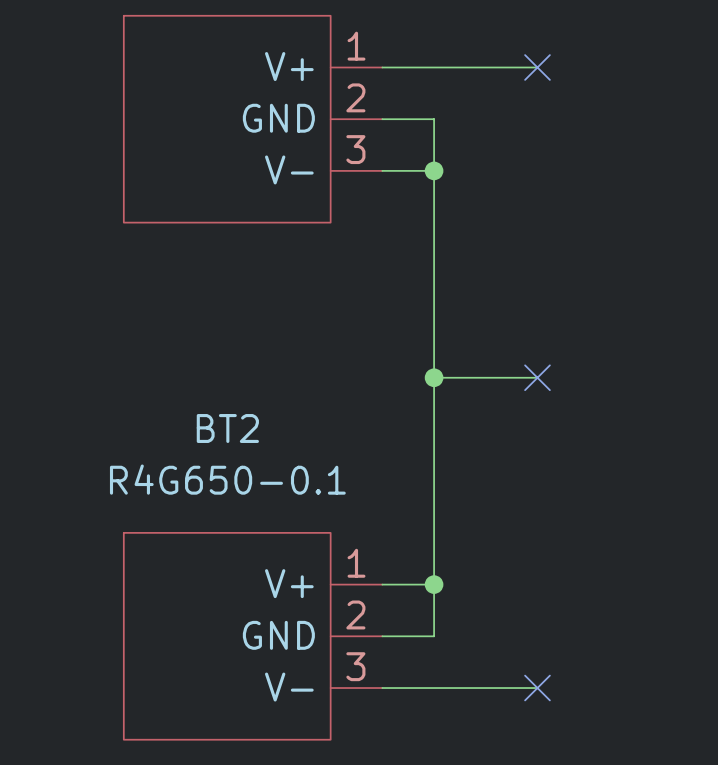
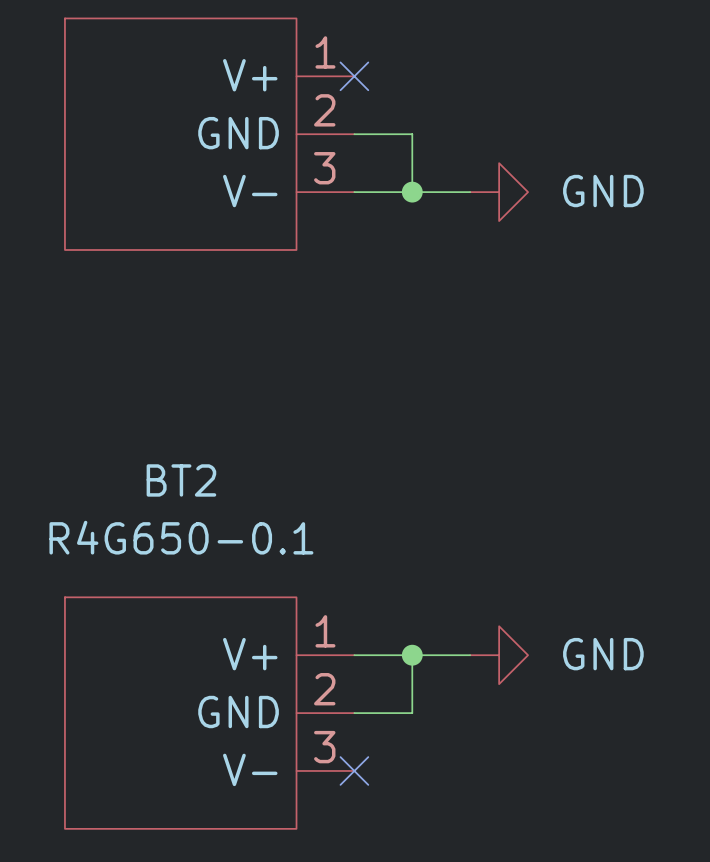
wire: (382, 67) (537, 67) -> none
no-connect mark: none -> (354, 76)
no-connect mark: (537, 67) -> none
wire: (434, 170) (434, 584) -> (412, 192) (470, 192)
power symbol: none -> GND (499, 192)
wire: (434, 377) (537, 377) -> none
junction: (434, 377) -> none
no-connect mark: (537, 377) -> none
wire: none -> (412, 655) (470, 655)
power symbol: none -> GND (499, 655)
wire: (382, 688) (537, 688) -> none
no-connect mark: none -> (354, 770)
no-connect mark: (537, 688) -> none

